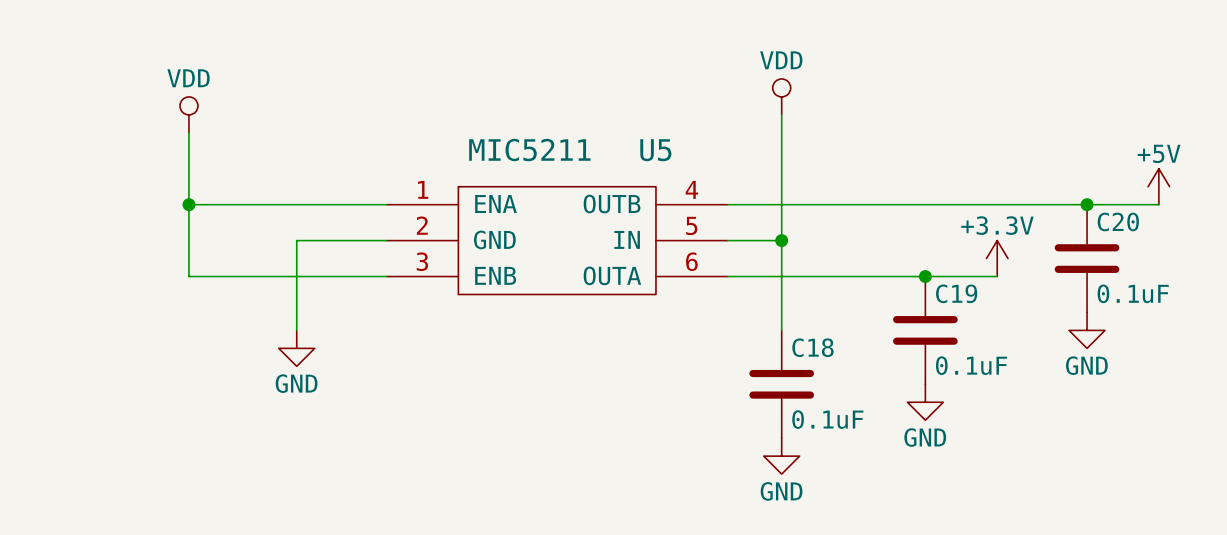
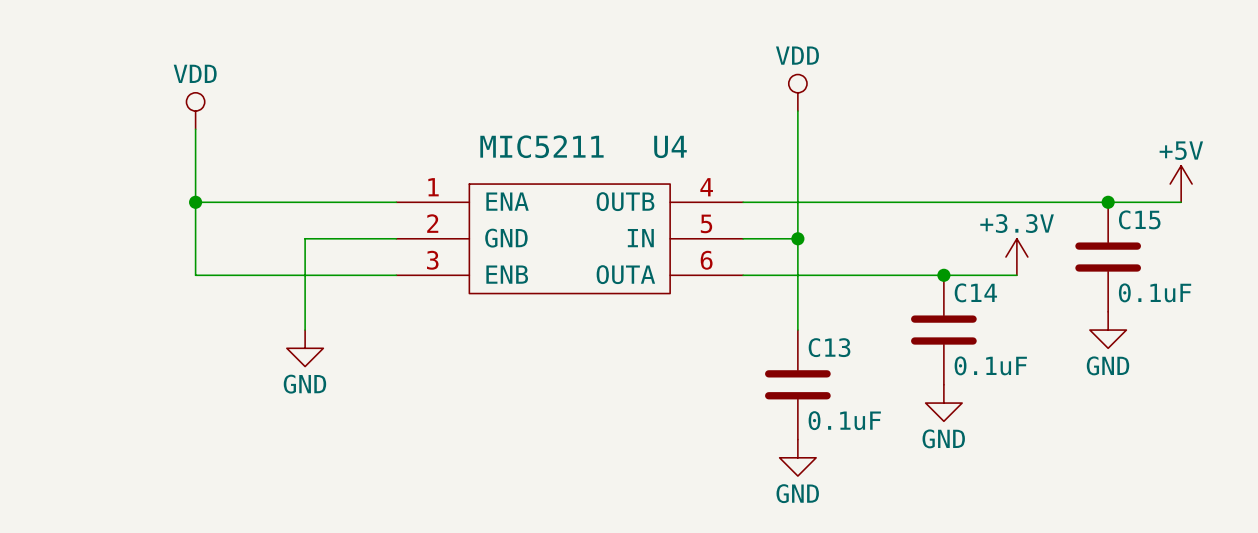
U5 name: U5 (655, 150) -> U4 (670, 146)
C20 name: C20 (1118, 221) -> C15 (1139, 219)
C19 name: C19 (956, 293) -> C14 (975, 292)
C18 name: C18 (812, 347) -> C13 (829, 347)

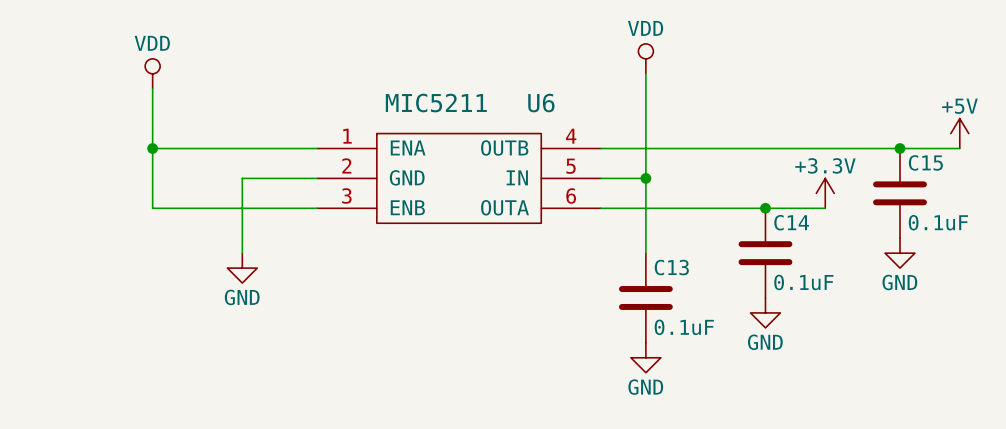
U4 name: U4 (670, 146) -> U6 (541, 103)

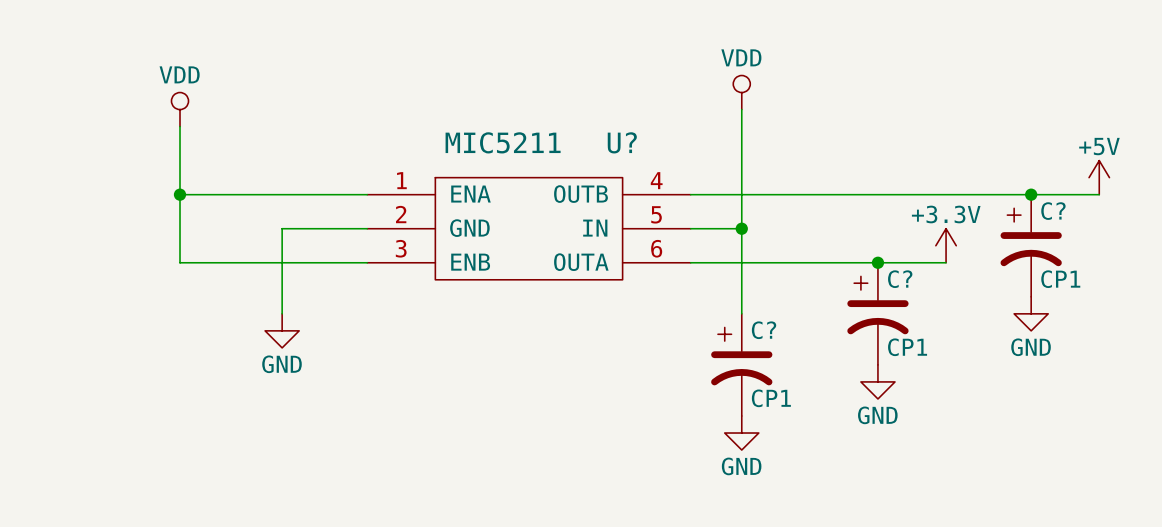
U6 name: U6 (541, 103) -> U? (622, 142)
C15: 0.1uF (900, 193) -> none
C?: none -> CP1 (1031, 245)
C14: 0.1uF (765, 253) -> none
C?: none -> CP1 (877, 313)
C13: 0.1uF (645, 297) -> none
C?: none -> CP1 (741, 364)

